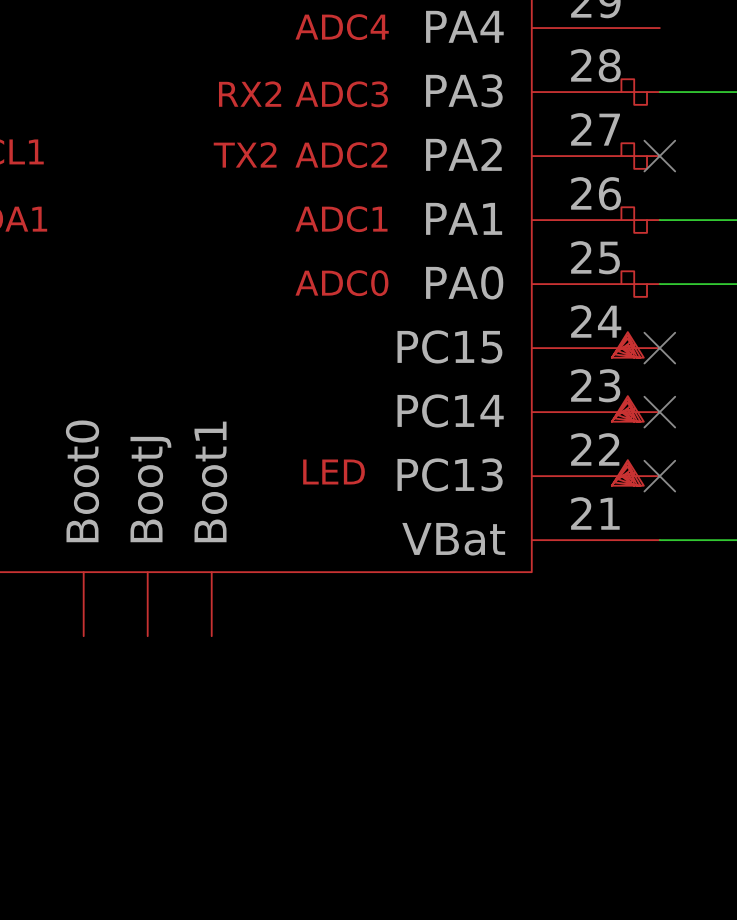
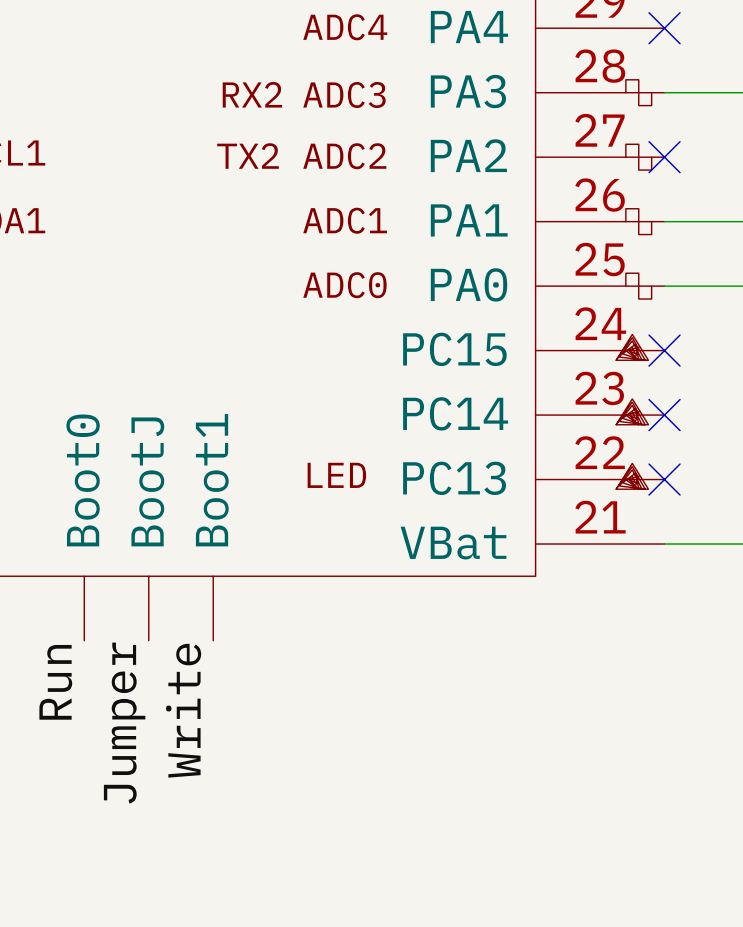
no-connect mark: none -> (664, 28)
label: none -> Run (55, 682)
label: none -> Write (183, 710)
label: none -> Jumper (124, 723)

